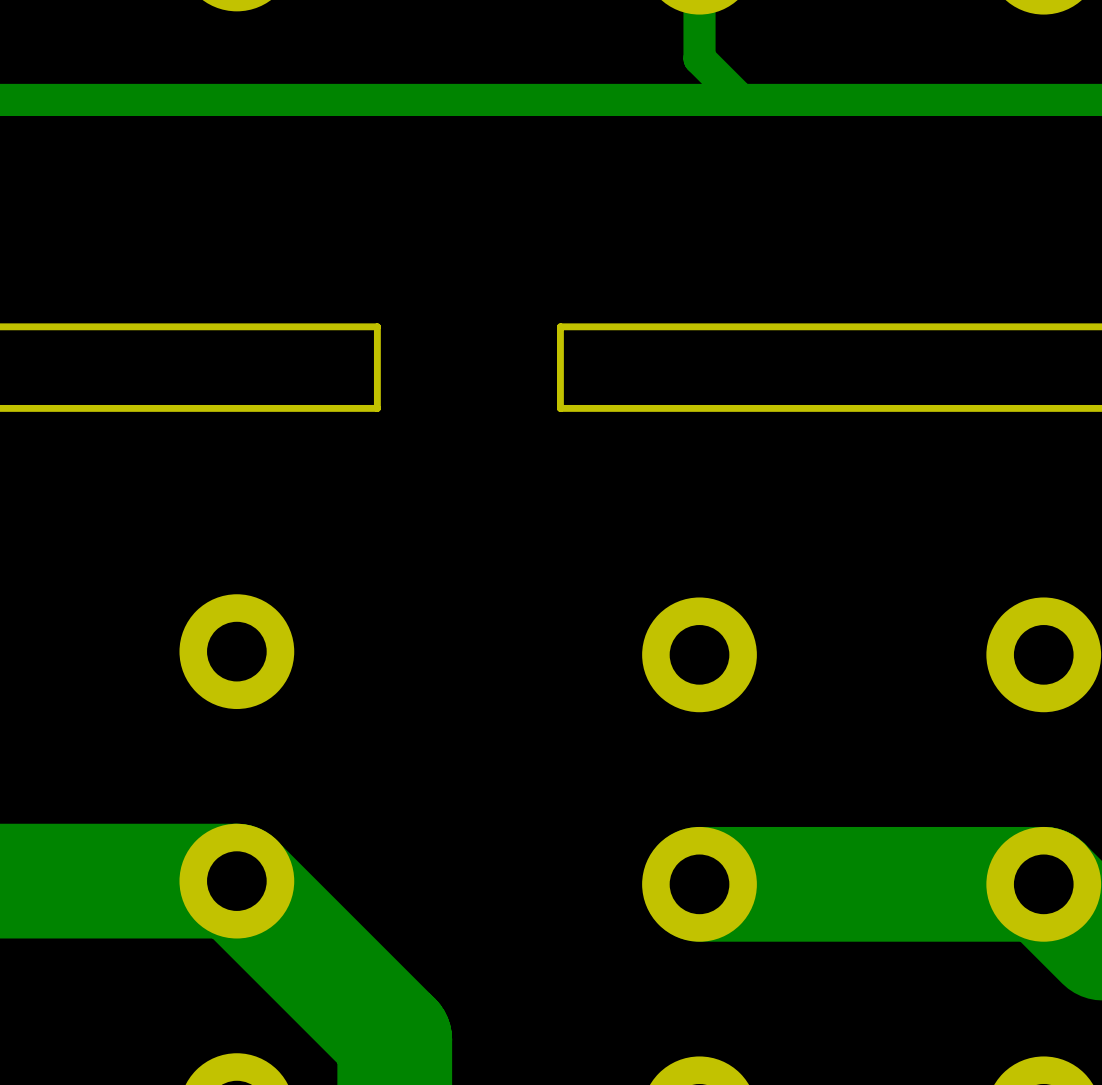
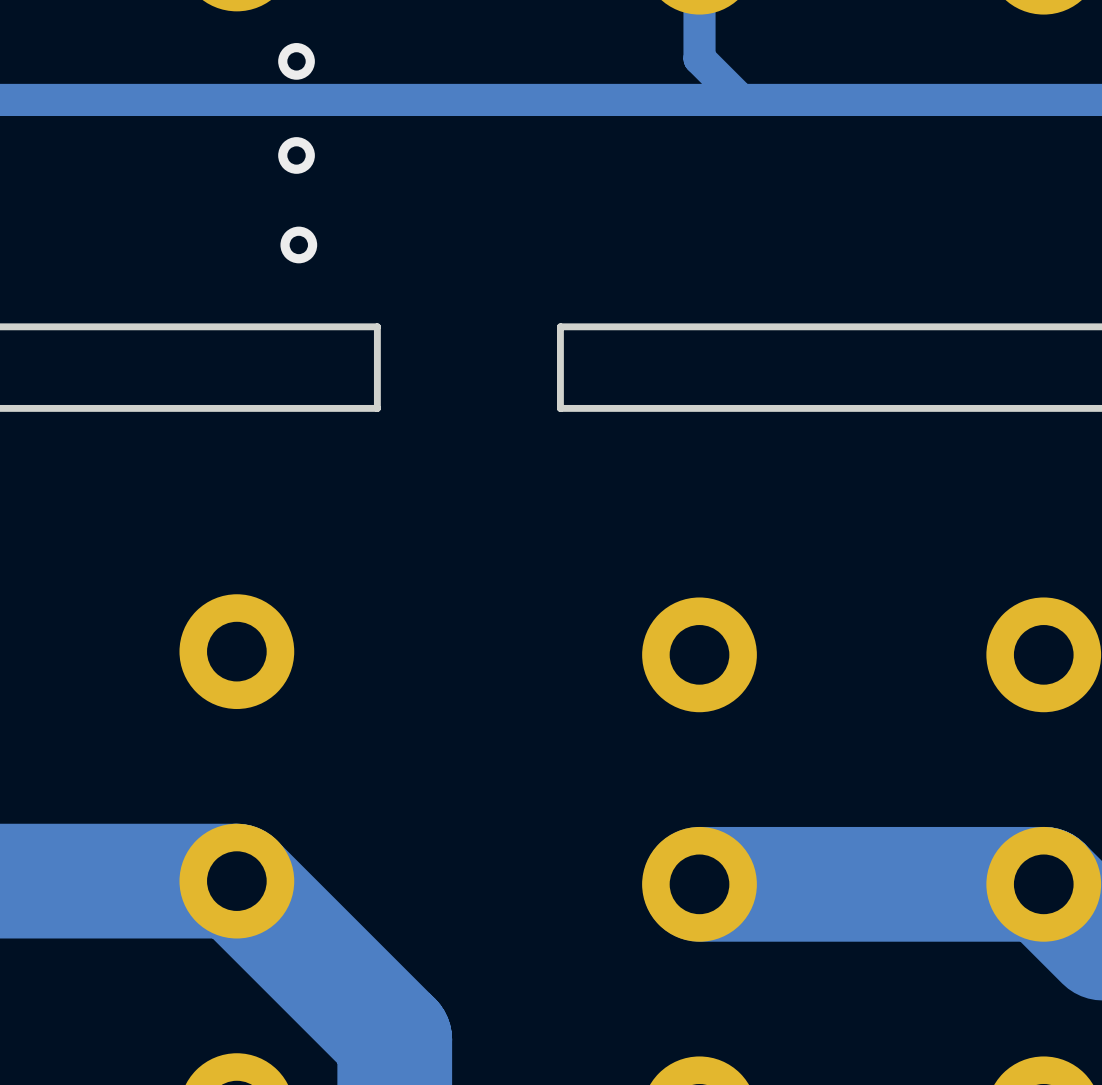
via: none -> (296, 61)
via: none -> (296, 155)
via: none -> (298, 244)

